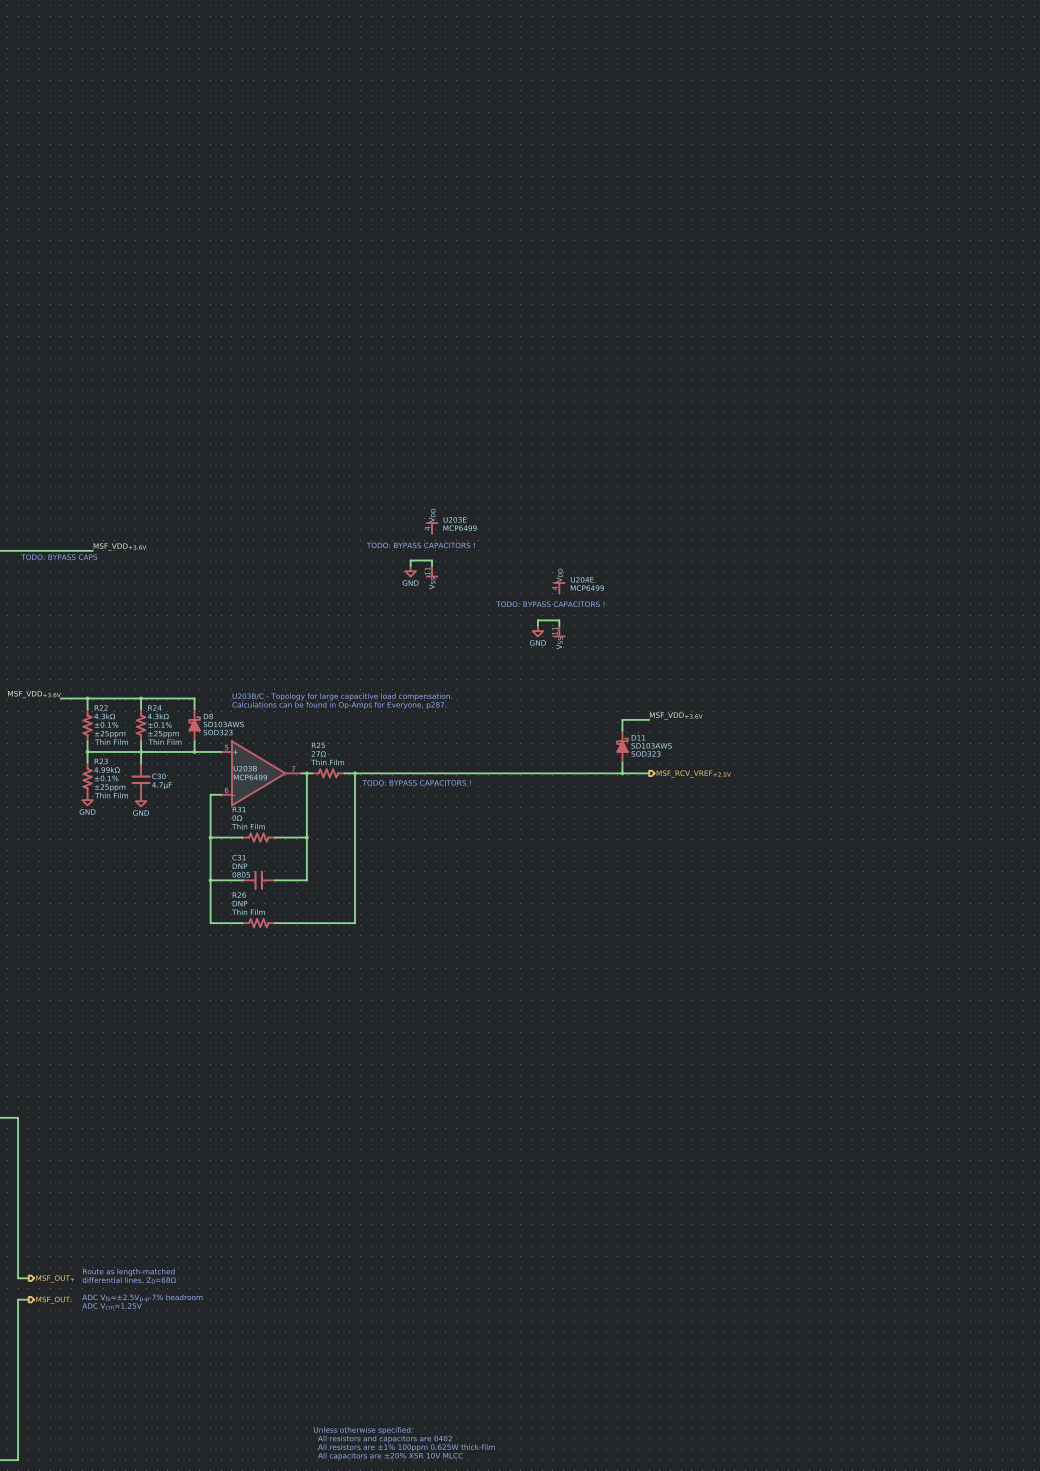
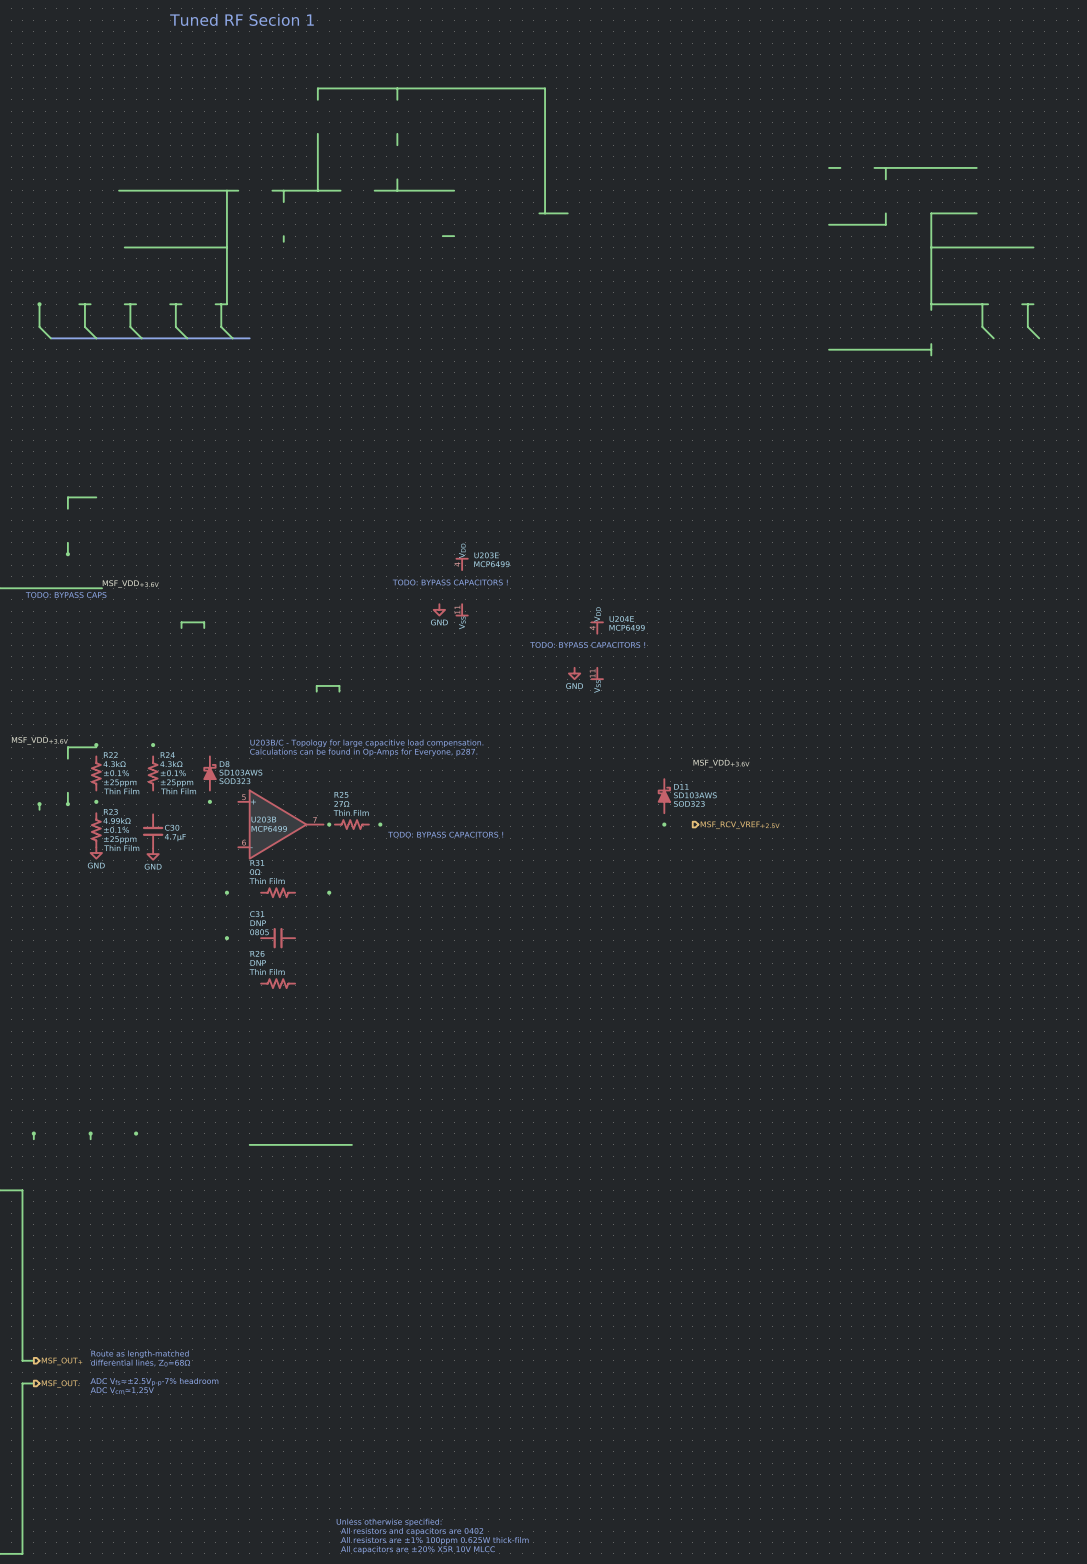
text: none -> Tuned RF Secion 1 (241, 19)
wire: none -> (397, 88) (397, 99)
wire: none -> (317, 99) (317, 88) (545, 88) (545, 213)
wire: none -> (317, 133) (317, 190)
wire: none -> (397, 133) (397, 145)
wire: none -> (829, 167) (840, 167)
wire: none -> (874, 167) (976, 167)
wire: none -> (885, 167) (885, 179)
wire: none -> (397, 179) (397, 190)
wire: none -> (119, 190) (238, 190)
wire: none -> (226, 190) (226, 304) (215, 304)
wire: none -> (272, 190) (340, 190)
wire: none -> (283, 190) (283, 202)
wire: none -> (374, 190) (454, 190)
wire: none -> (539, 213) (567, 213)
wire: none -> (885, 213) (885, 224) (829, 224)
wire: none -> (976, 213) (931, 213) (931, 309)
wire: none -> (283, 236) (283, 241)
wire: none -> (442, 236) (454, 236)
wire: none -> (124, 247) (226, 247)
wire: none -> (931, 247) (1033, 247)
wire: none -> (39, 304) (39, 327) (50, 338)
junction: none -> (39, 304)
wire: none -> (79, 304) (90, 304)
wire: none -> (84, 304) (84, 327) (96, 338)
wire: none -> (124, 304) (136, 304)
wire: none -> (130, 304) (130, 327) (141, 338)
wire: none -> (170, 304) (181, 304)
wire: none -> (175, 304) (175, 327) (187, 338)
wire: none -> (221, 304) (221, 327) (232, 338)
wire: none -> (931, 304) (988, 304)
wire: none -> (982, 304) (982, 327) (993, 338)
wire: none -> (1022, 304) (1033, 304)
wire: none -> (1027, 304) (1027, 327) (1039, 338)
bus: none -> (50, 338) (249, 338)
wire: none -> (931, 344) (931, 355)
wire: none -> (829, 349) (931, 349)
wire: none -> (96, 497) (67, 497) (67, 508)
wire: none -> (67, 542) (67, 554)
junction: none -> (67, 554)
wire: (410, 565) (410, 560) (432, 560) (432, 565) -> none
wire: none -> (181, 628) (181, 622) (204, 622) (204, 628)
wire: (537, 625) (537, 620) (559, 620) (559, 625) -> none
wire: none -> (316, 691) (316, 685) (339, 685) (339, 691)
wire: (60, 698) (194, 698) (194, 709) -> none
wire: (87, 698) (87, 709) -> (67, 792) (67, 804)
wire: (141, 698) (141, 709) -> none
wire: none -> (96, 747) (67, 747) (67, 758)
wire: (649, 719) (622, 719) (622, 730) -> none
wire: (87, 741) (87, 762) -> none
wire: (141, 741) (141, 763) -> none
wire: (194, 741) (194, 751) -> none
wire: (87, 751) (221, 751) -> none
wire: none -> (39, 804) (39, 809)
junction: none -> (39, 804)
junction: none -> (67, 804)
wire: (622, 762) (622, 773) -> none
wire: (301, 773) (312, 773) -> none
wire: (306, 773) (306, 880) (274, 880) -> none
wire: (344, 773) (649, 773) -> none
wire: (355, 773) (355, 923) (274, 923) -> none
wire: (221, 794) (210, 794) (210, 923) (242, 923) -> none
wire: (210, 837) (242, 837) -> none
wire: (274, 837) (306, 837) -> none
wire: (210, 880) (242, 880) -> none
wire: none -> (33, 1133) (33, 1139)
junction: none -> (33, 1133)
wire: none -> (90, 1133) (90, 1139)
junction: none -> (90, 1133)
junction: none -> (136, 1133)
wire: none -> (249, 1144) (351, 1144)

